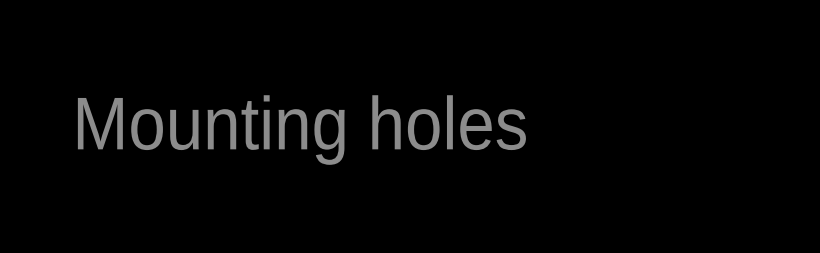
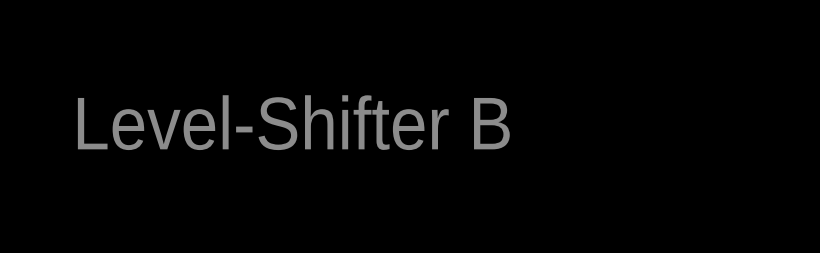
text: Mounting holes (301, 130) -> Level-Shifter B (293, 122)

